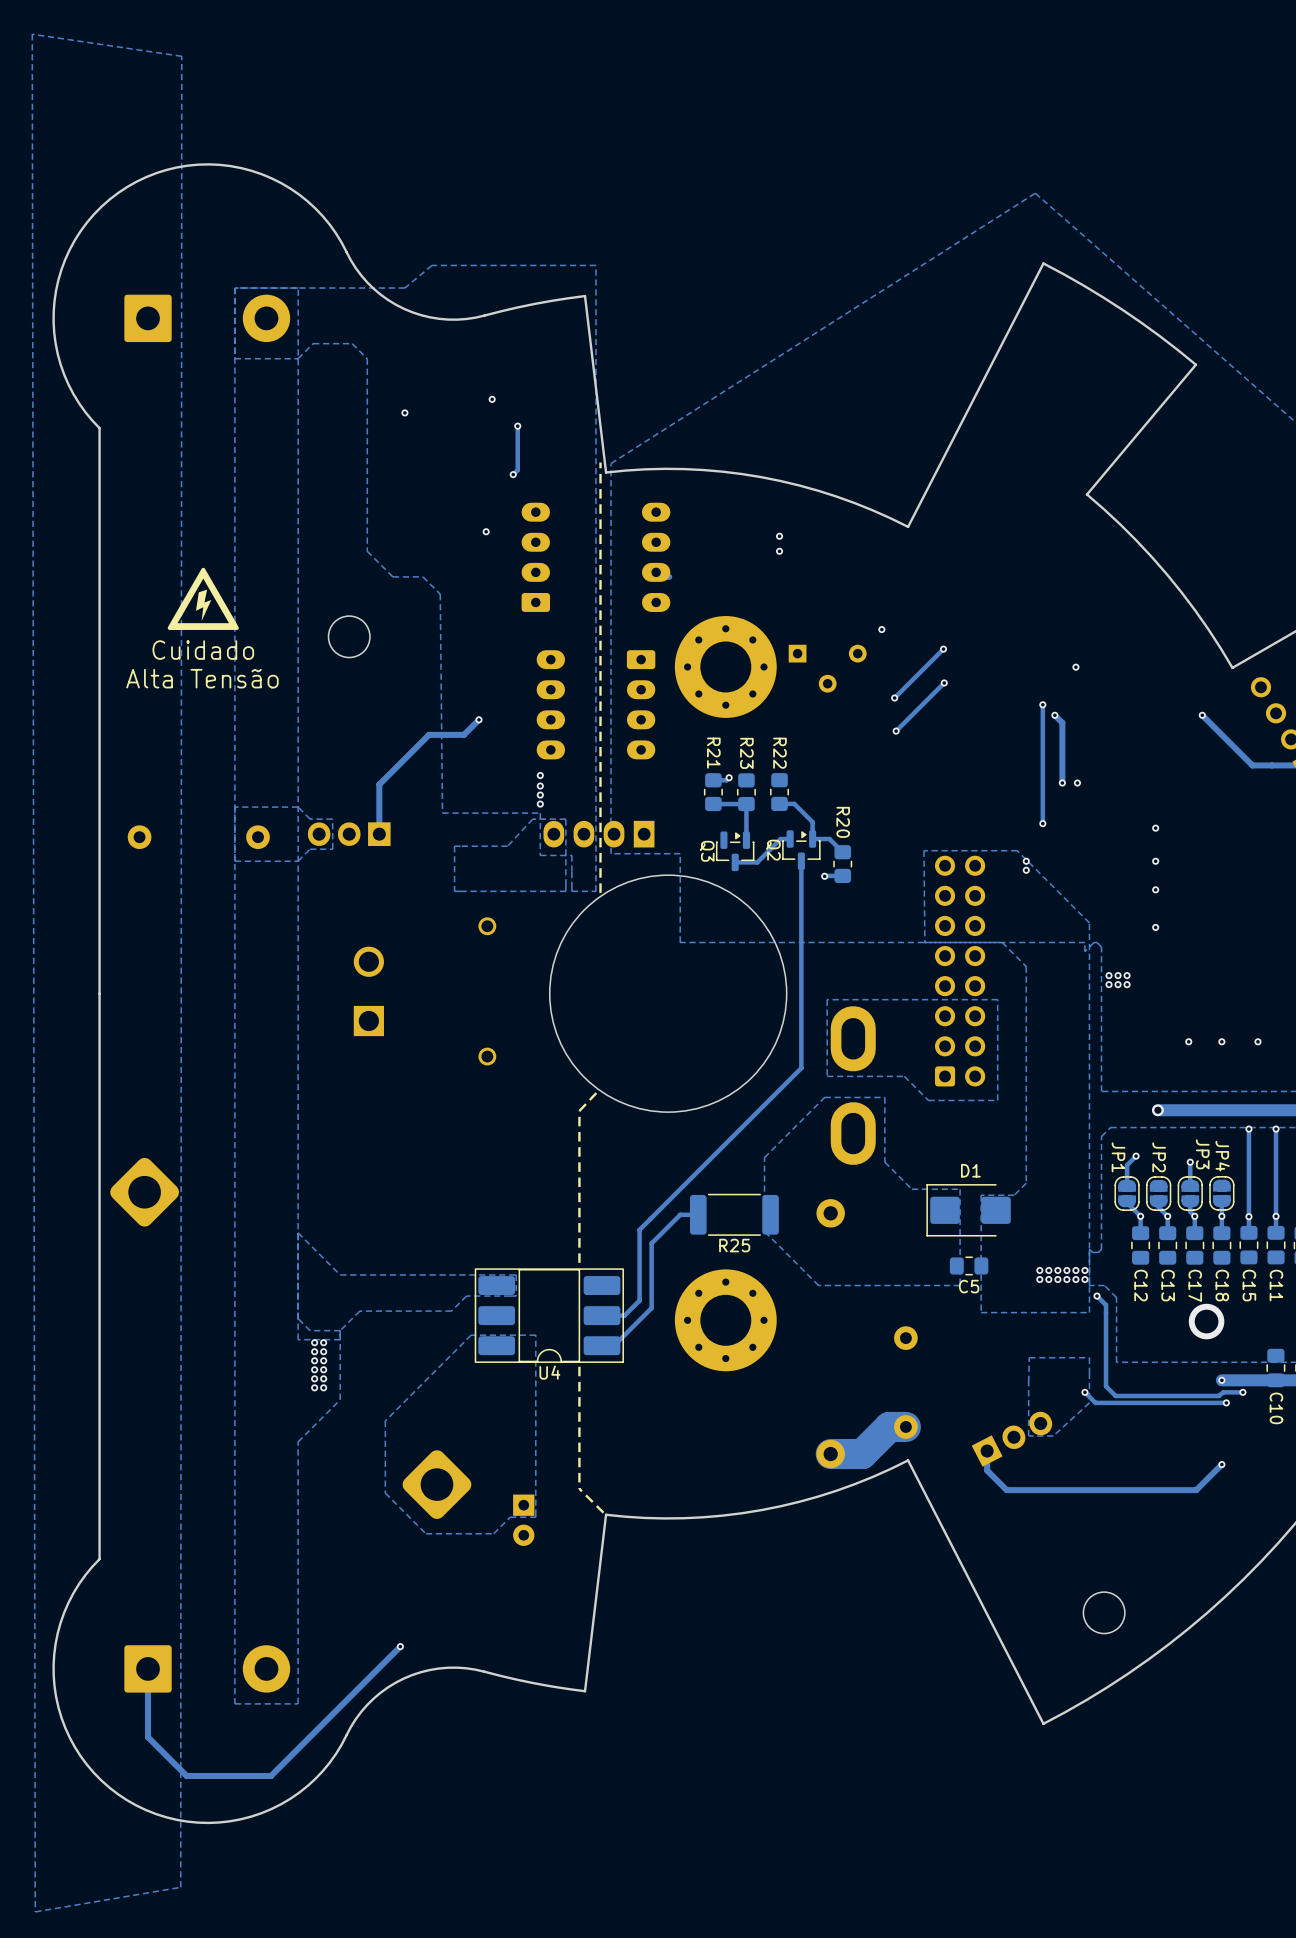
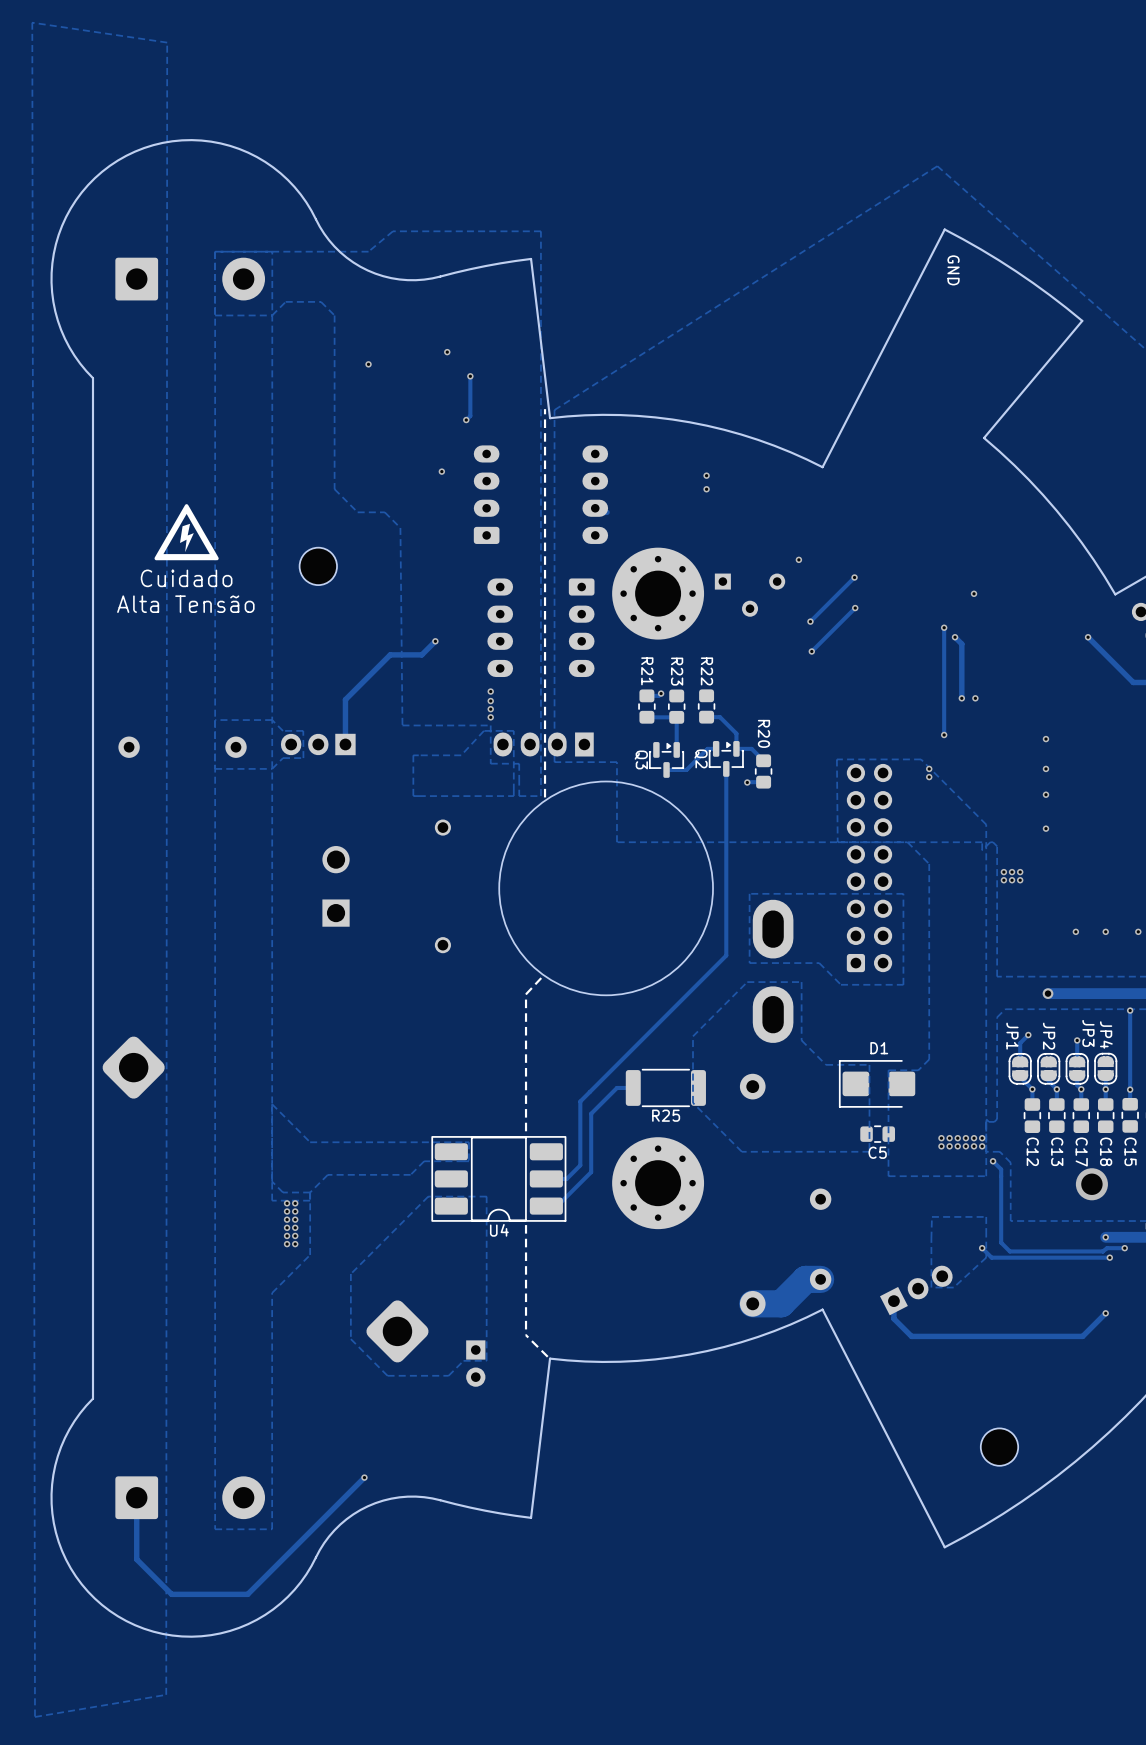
text: none -> GND (953, 270)

